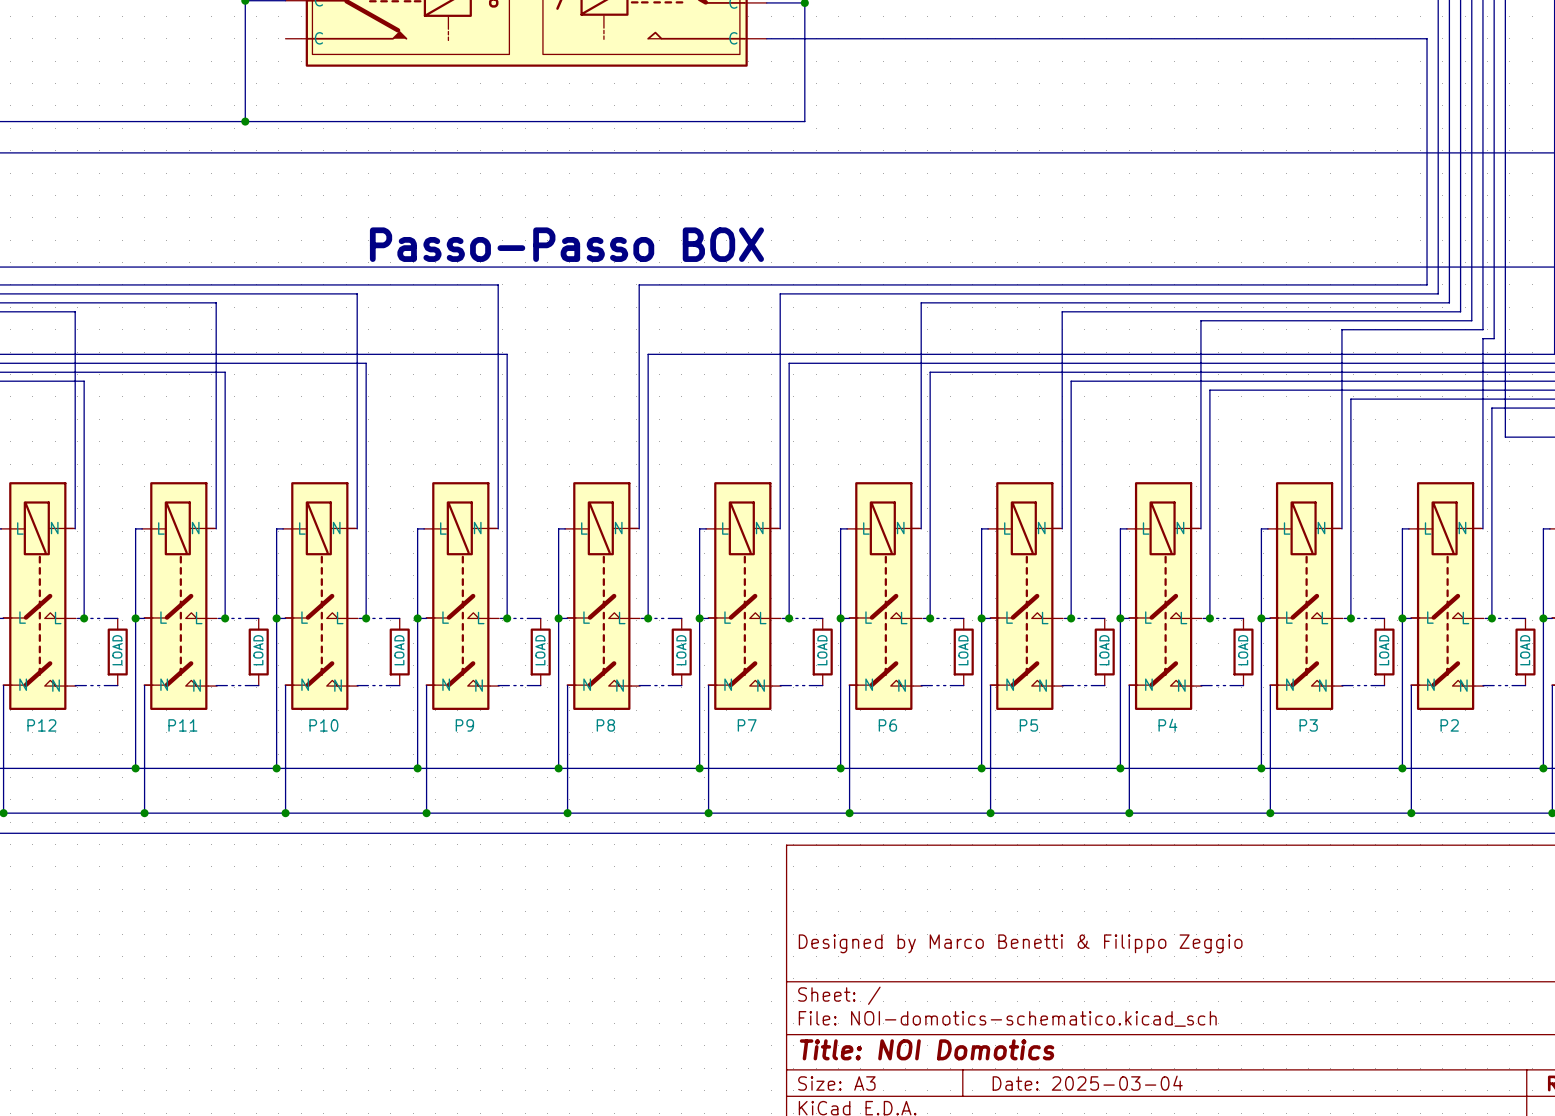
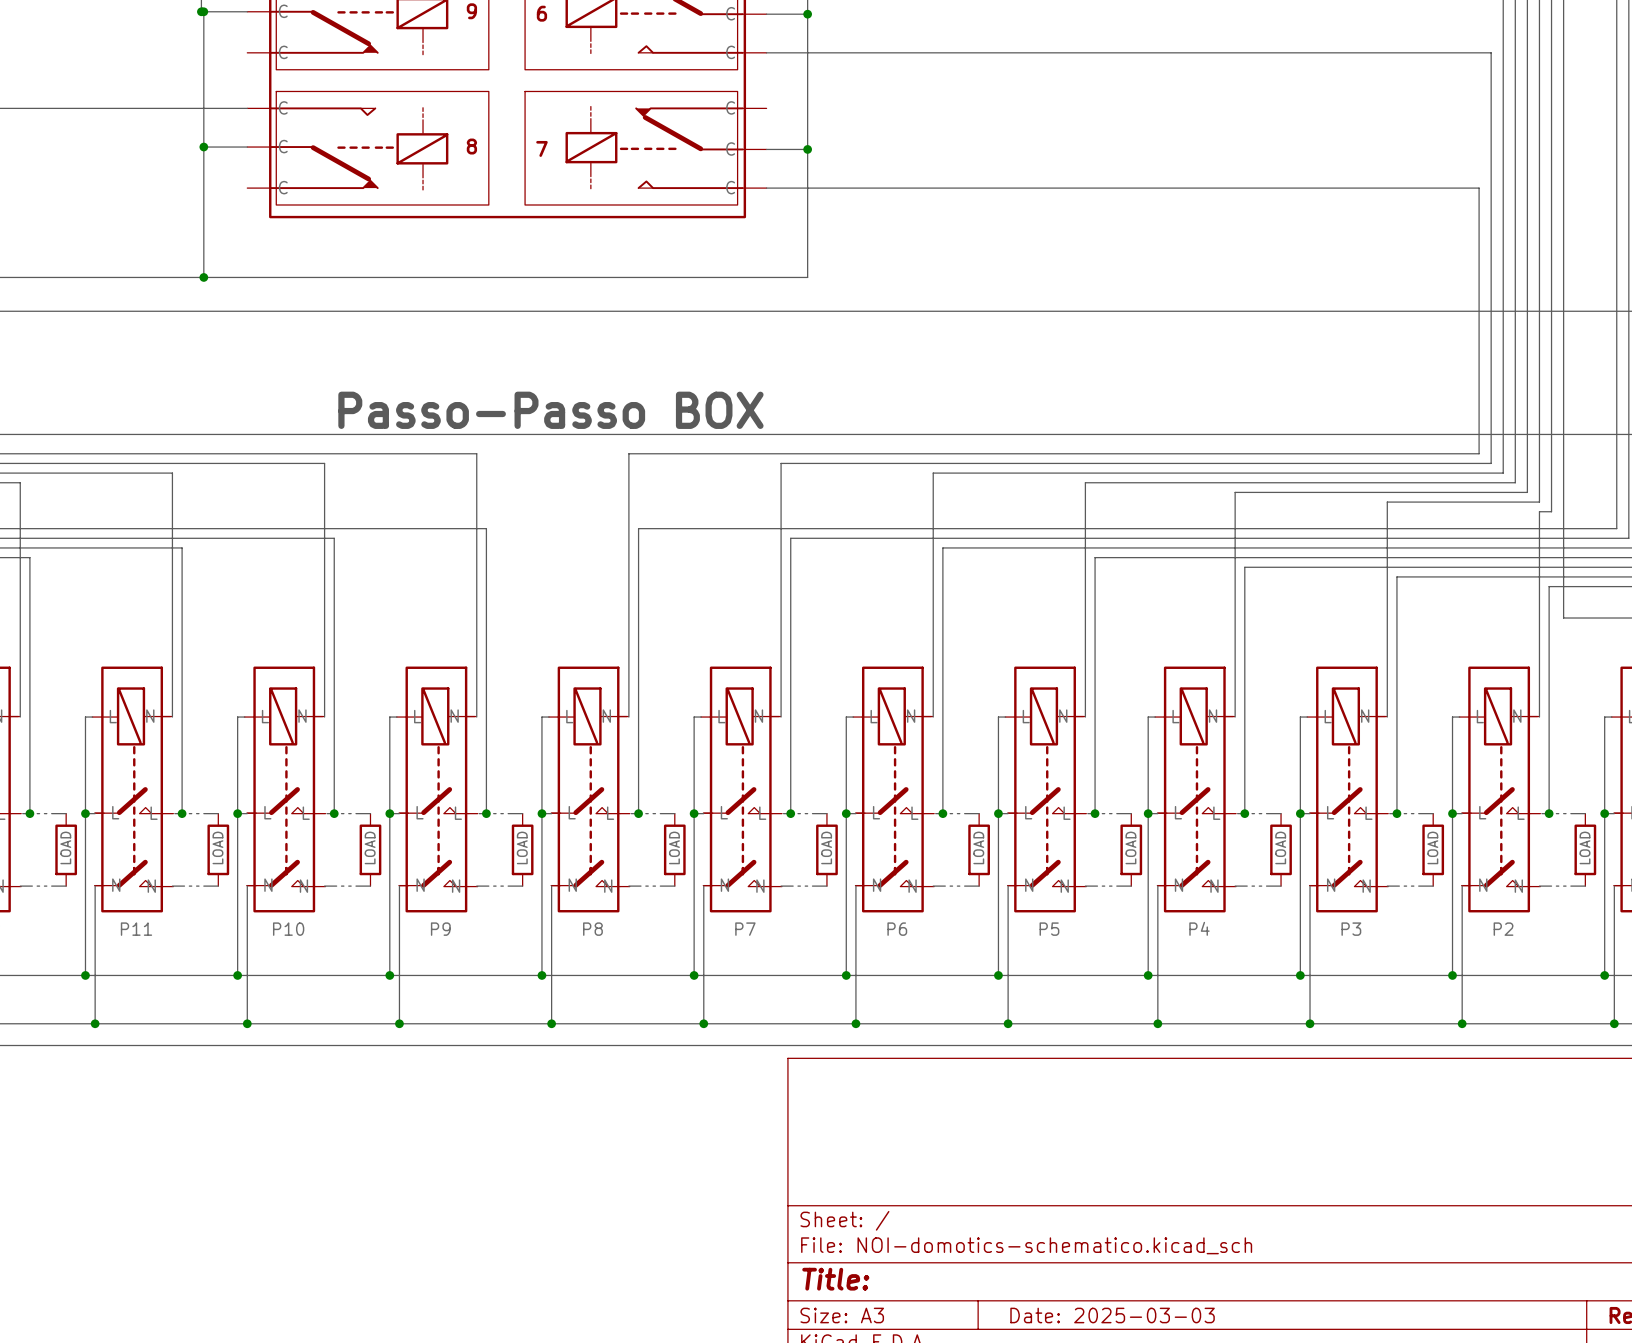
title block: Designed by Marco Benetti & Filippo Zeggio (1020, 943) -> none
title block: Title: NOI Domotics (927, 1049) -> Title: (835, 1279)
title block: Date: 2025-03-04 (1087, 1083) -> Date: 2025-03-03 (1112, 1315)

